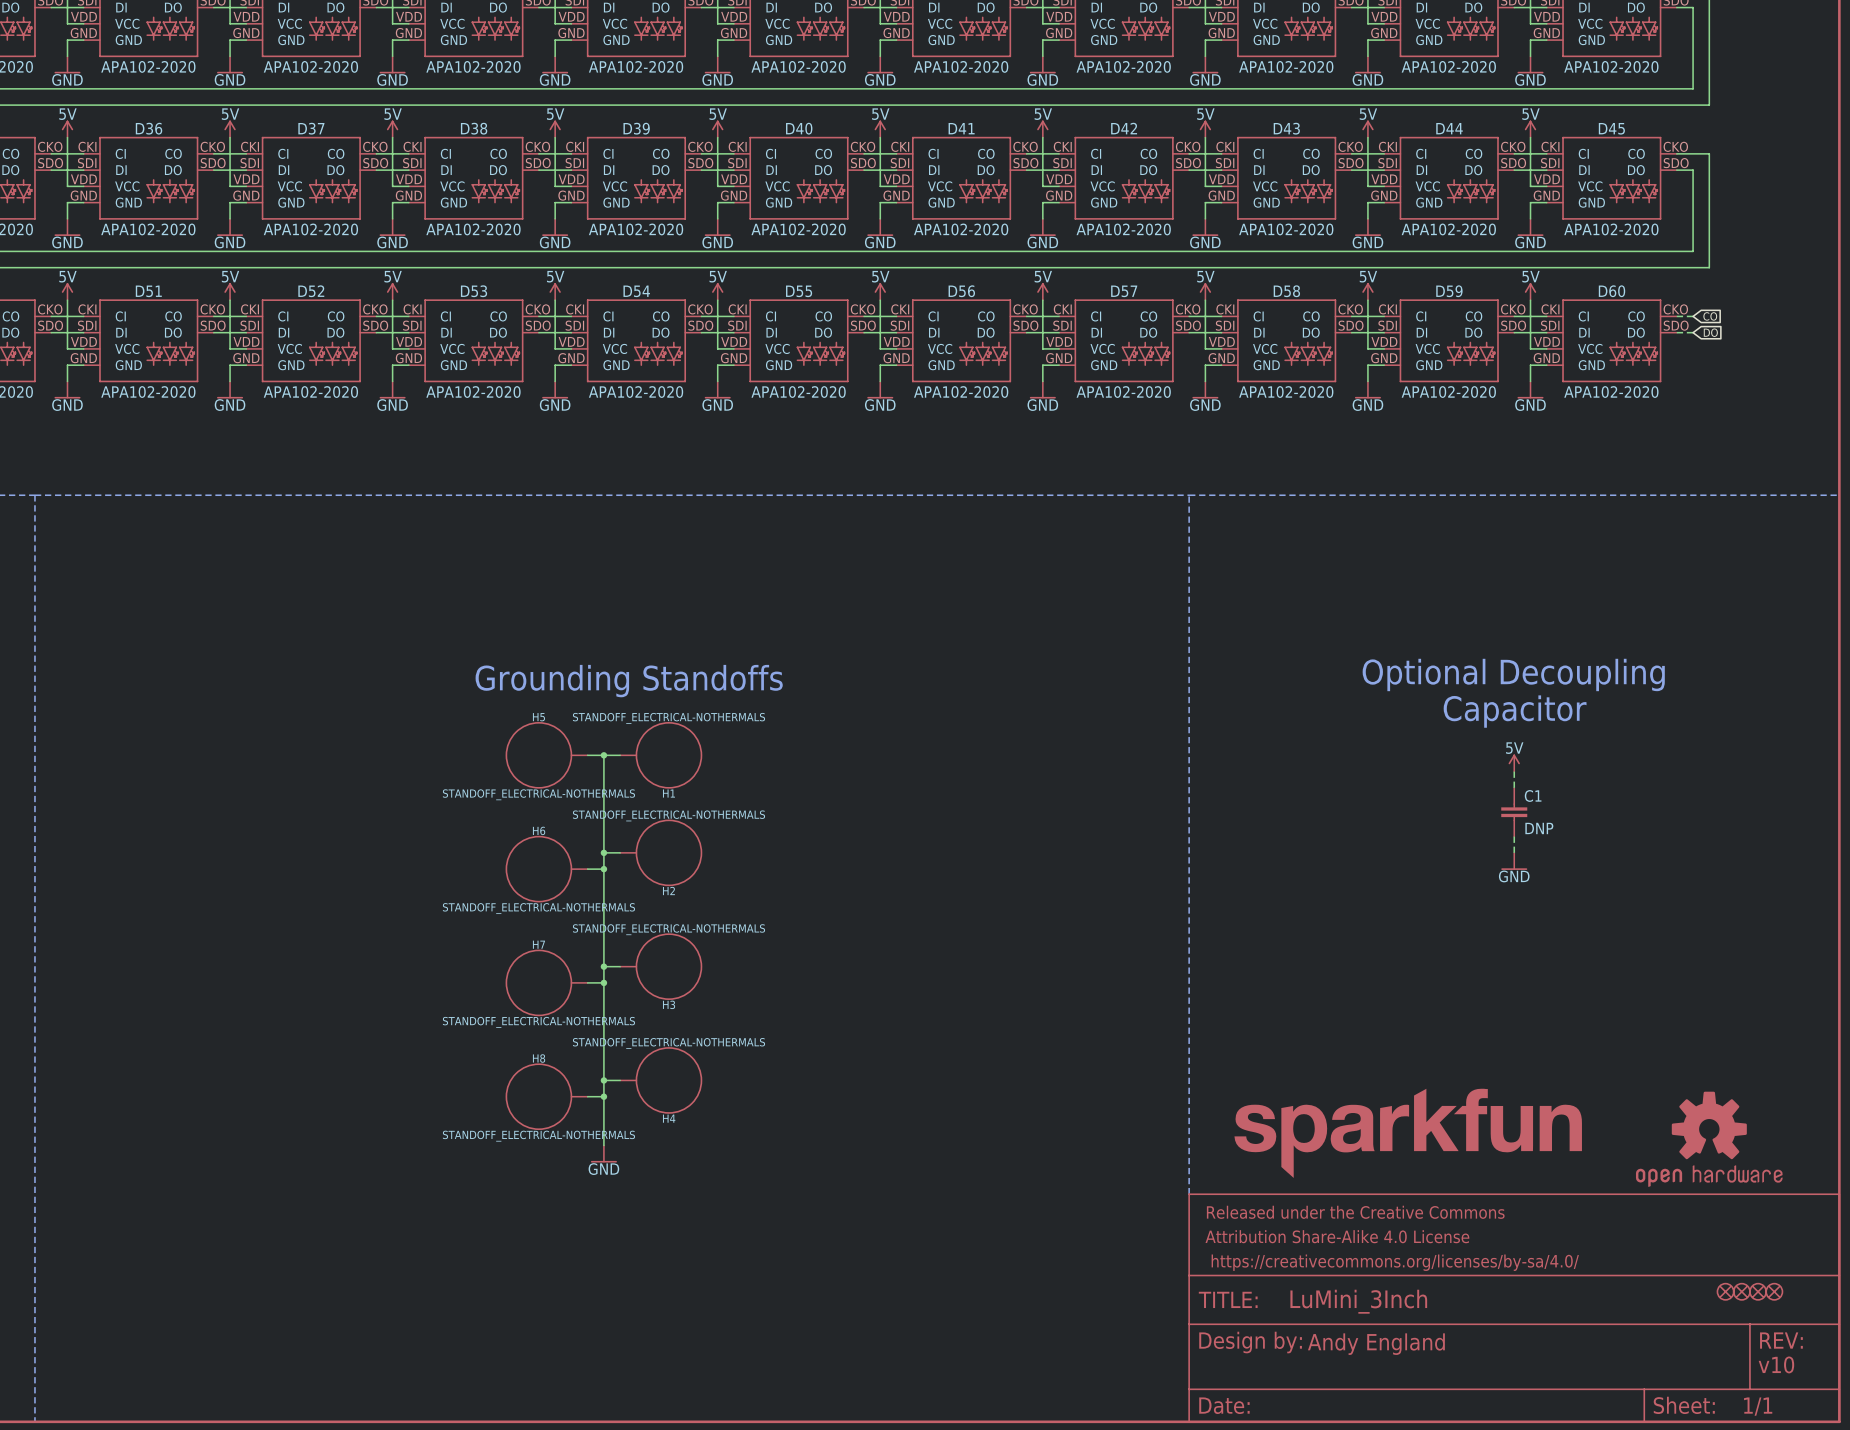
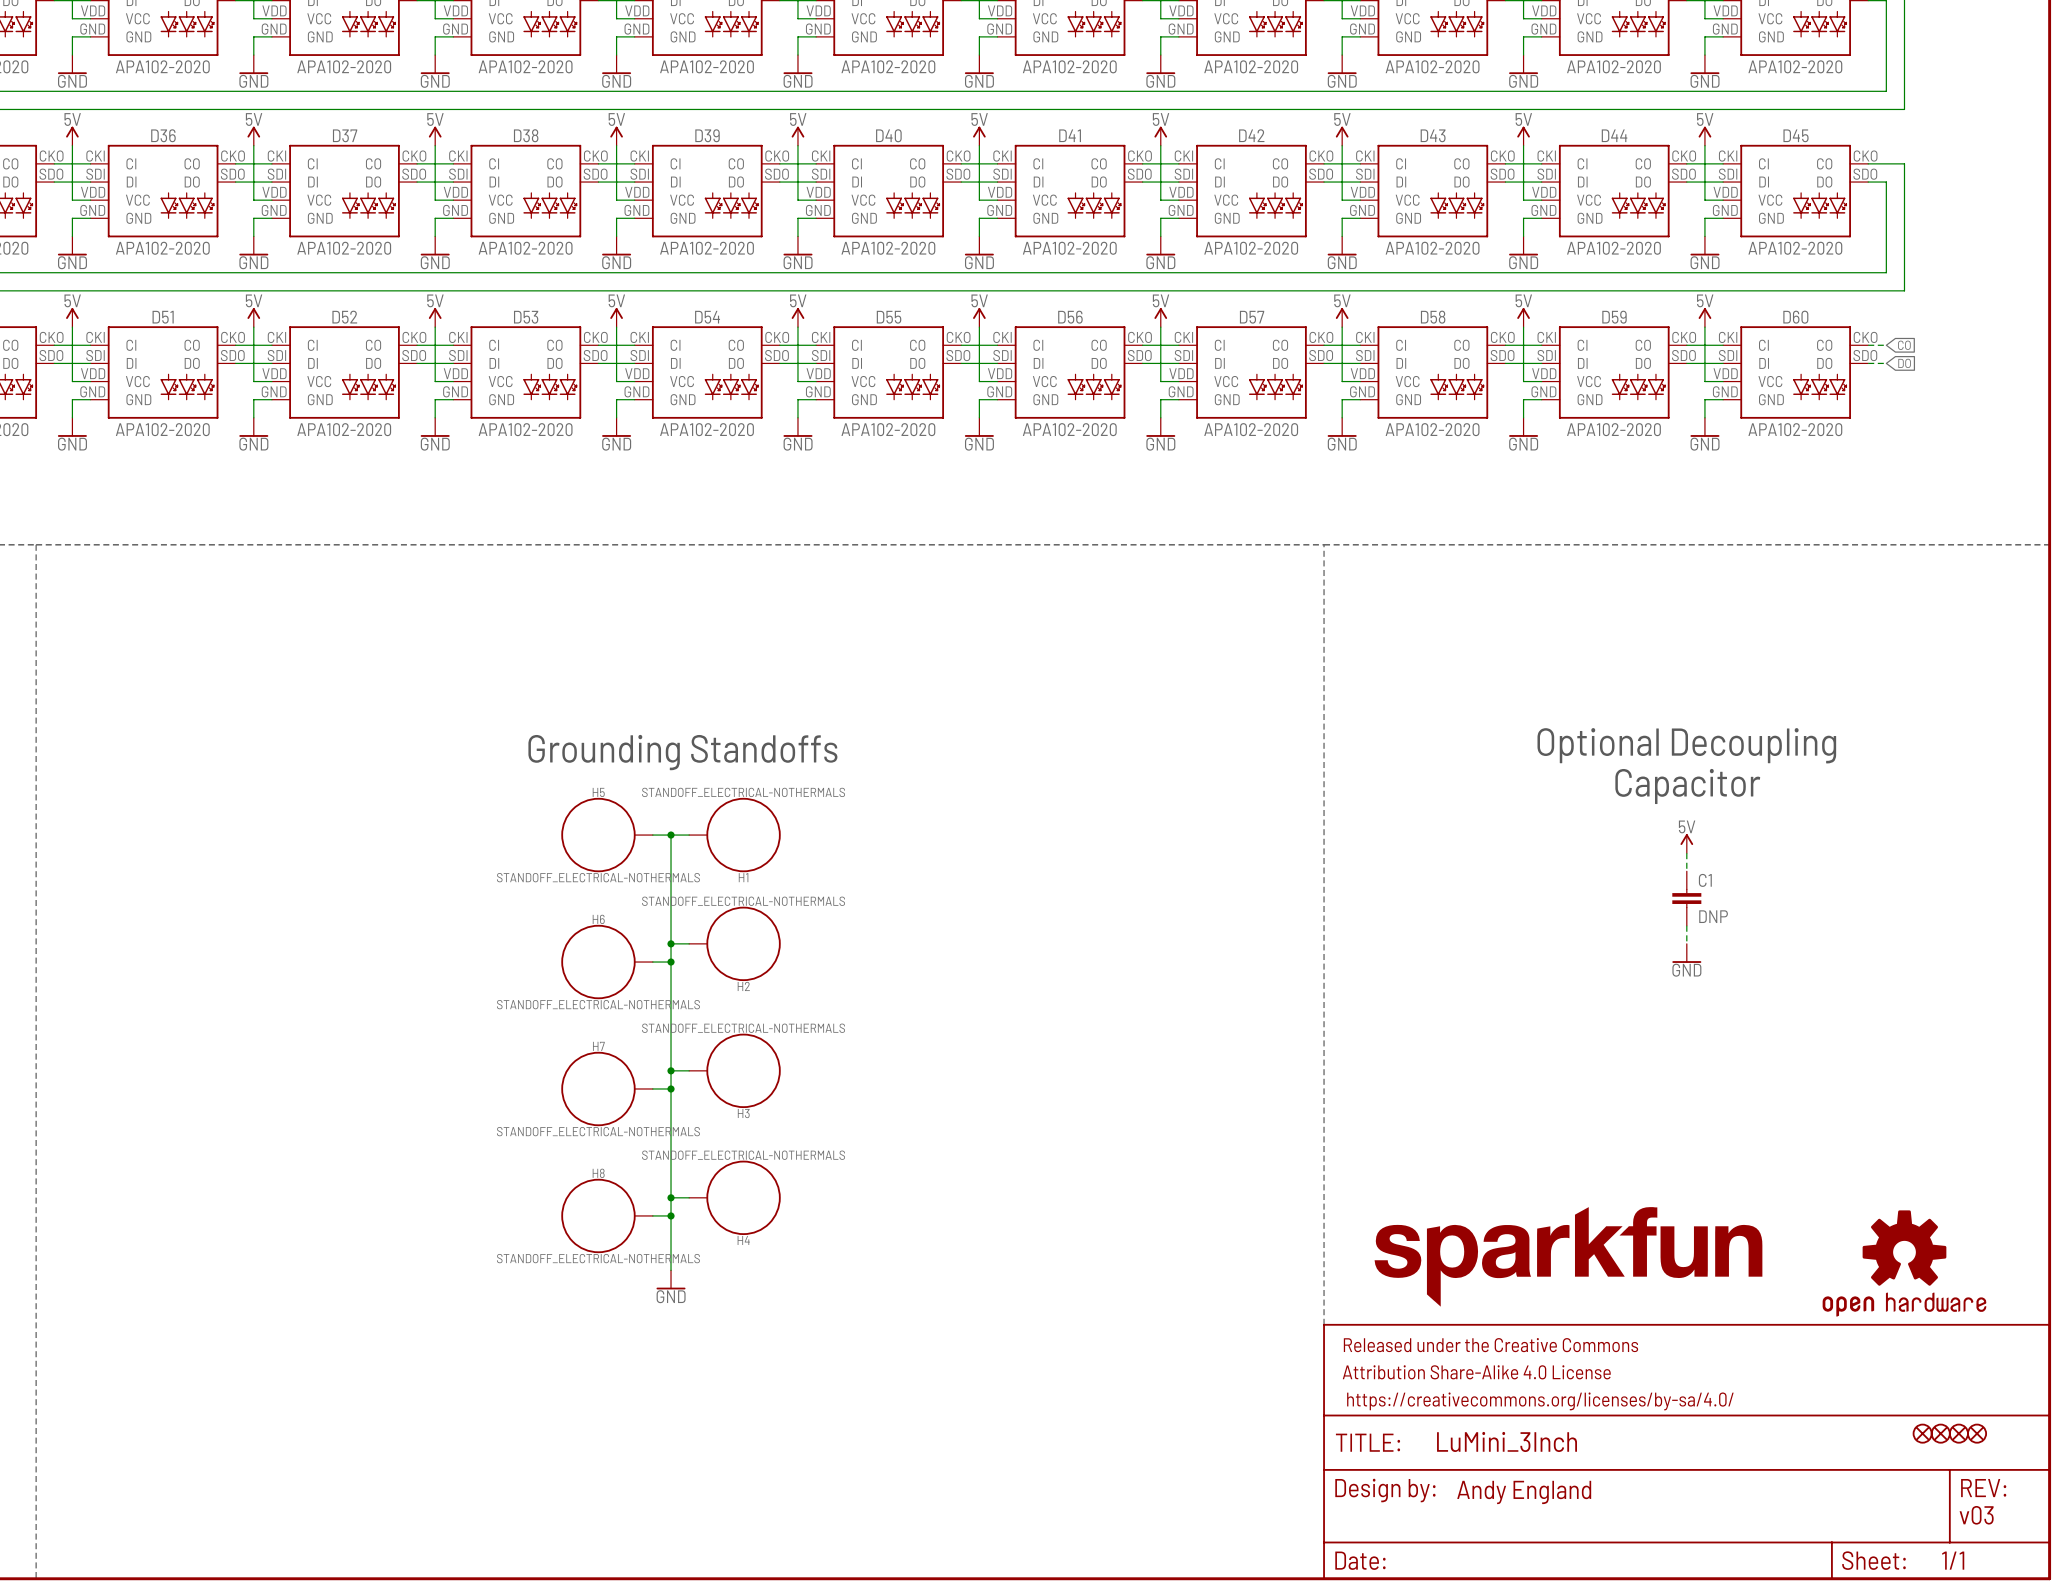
text: v10 (1776, 1364) -> v03 (1976, 1515)

